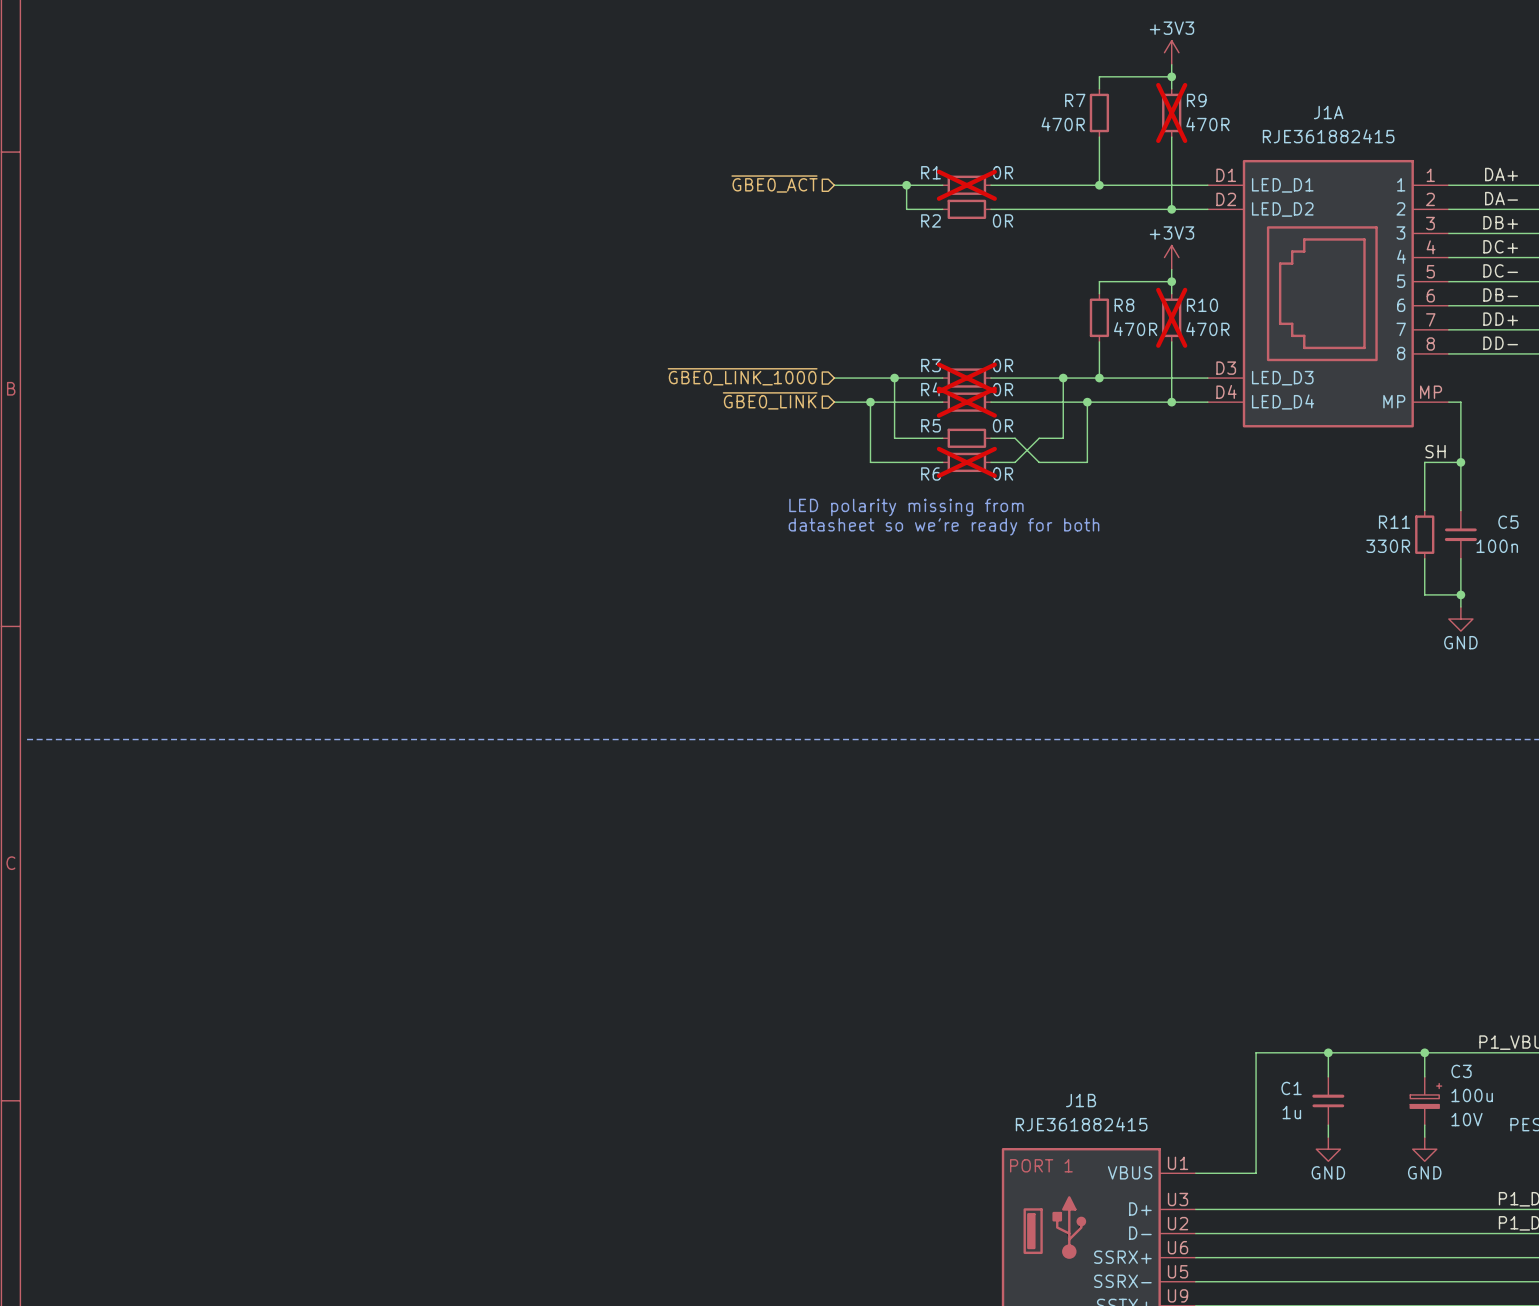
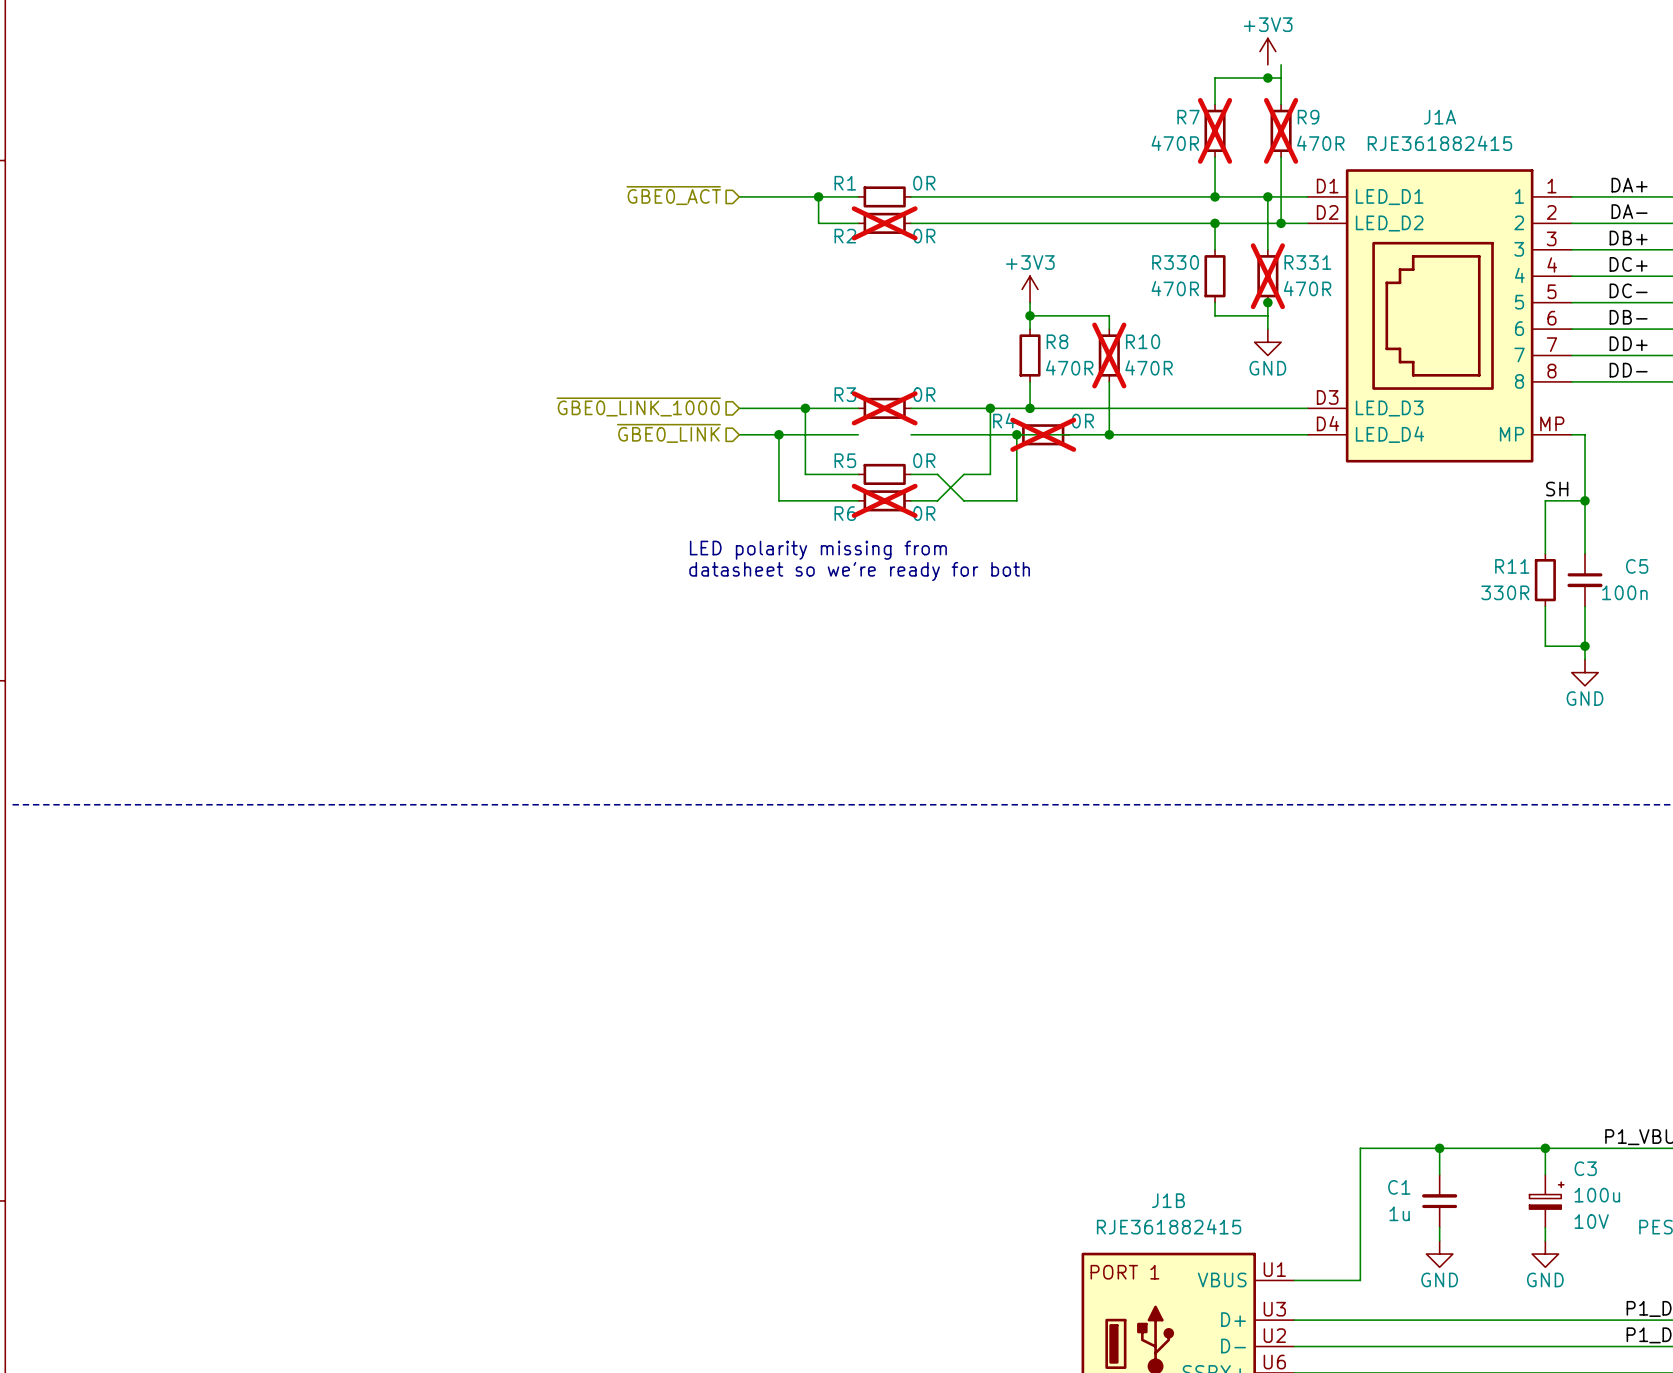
wire: (1171, 64) (1171, 88) -> (1267, 223) (1267, 249)
wire: none -> (1281, 64) (1281, 104)
wire: (1123, 76) (1099, 76) (1099, 88) -> (1215, 78) (1215, 104)
wire: none -> (1267, 78) (1281, 78)
R7 position: (1099, 112) -> (1215, 130)
R9 position: (1171, 112) -> (1281, 130)
R7 do-not-place cross: none -> (1215, 130)
wire: (1099, 137) (1099, 185) -> (1109, 381) (1109, 434)
wire: (1171, 137) (1171, 185) -> none
hierarchical label position: ~{GBE0_ACT} (774, 184) -> ~{GBE0_ACT} (673, 195)
wire: none -> (739, 196) (858, 196)
wire: none -> (818, 196) (818, 223) (858, 223)
junction: none -> (818, 196)
wire: (906, 185) (906, 209) -> (911, 223) (977, 223)
junction: (906, 185) -> none
R1 position: (966, 185) -> (884, 196)
R1 do-not-place cross: (966, 185) -> none
junction: (1099, 185) -> none
junction: none -> (1215, 196)
junction: none -> (1267, 196)
R2 do-not-place cross: none -> (884, 223)
wire: none -> (1016, 223) (1069, 223)
R2 position: (966, 209) -> (884, 223)
wire: none -> (1215, 223) (1215, 249)
junction: none -> (1215, 223)
junction: (1171, 209) -> none
junction: none -> (1281, 223)
R330: none -> (1215, 276)
R331: none -> (1267, 276)
power symbol position: +3V3 (1171, 257) -> +3V3 (1030, 289)
wire: (1171, 269) (1171, 281) (1099, 281) (1099, 293) -> none
wire: none -> (1030, 302) (1030, 329)
wire: none -> (1215, 302) (1215, 315) (1267, 315) (1267, 329)
wire: none -> (1030, 315) (1109, 315) (1109, 329)
junction: none -> (1030, 315)
R8 position: (1099, 317) -> (1030, 355)
R10 position: (1171, 317) -> (1109, 355)
power symbol: none -> GND (1267, 342)
wire: (1099, 341) (1099, 378) -> (1215, 157) (1215, 196)
wire: (1171, 341) (1171, 402) -> (1281, 157) (1281, 223)
wire: none -> (1030, 381) (1030, 408)
hierarchical label position: ~{GBE0_LINK_1000} (742, 376) -> ~{GBE0_LINK_1000} (638, 406)
wire: none -> (739, 408) (858, 408)
wire: none -> (805, 408) (805, 474) (858, 474)
junction: none -> (805, 408)
wire: (894, 378) (894, 438) -> (911, 500) (937, 500) (963, 474)
junction position: (894, 378) -> (990, 408)
junction: none -> (1030, 408)
R3 position: (966, 378) -> (884, 408)
wire: (1063, 378) (1063, 438) (1039, 438) (1015, 462) (990, 462) -> none
junction: (1063, 378) -> none
junction: (1099, 378) -> none
hierarchical label position: ~{GBE0_LINK} (770, 400) -> ~{GBE0_LINK} (668, 433)
wire: none -> (739, 434) (858, 434)
wire: none -> (778, 434) (778, 500) (858, 500)
junction: none -> (778, 434)
wire: (834, 402) (846, 402) -> none
wire: (870, 402) (870, 462) (894, 462) -> (911, 474) (937, 474) (963, 500)
junction: (870, 402) -> none
junction: none -> (1016, 434)
wire: none -> (1069, 434) (1016, 434) (1016, 500)
junction: none -> (1109, 434)
wire: (1087, 402) (1087, 462) (1039, 462) (1015, 438) (990, 438) -> none
junction: (1087, 402) -> none
junction: (1171, 402) -> none
wire: (918, 438) (942, 438) -> (990, 474) (990, 408)
R5 position: (966, 438) -> (884, 474)
R6 position: (966, 462) -> (884, 500)
text position: LED polarity missing from (906, 507) -> LED polarity missing from (818, 550)
text position: datasheet so we're ready for both (944, 526) -> datasheet so we're ready for both (859, 571)

